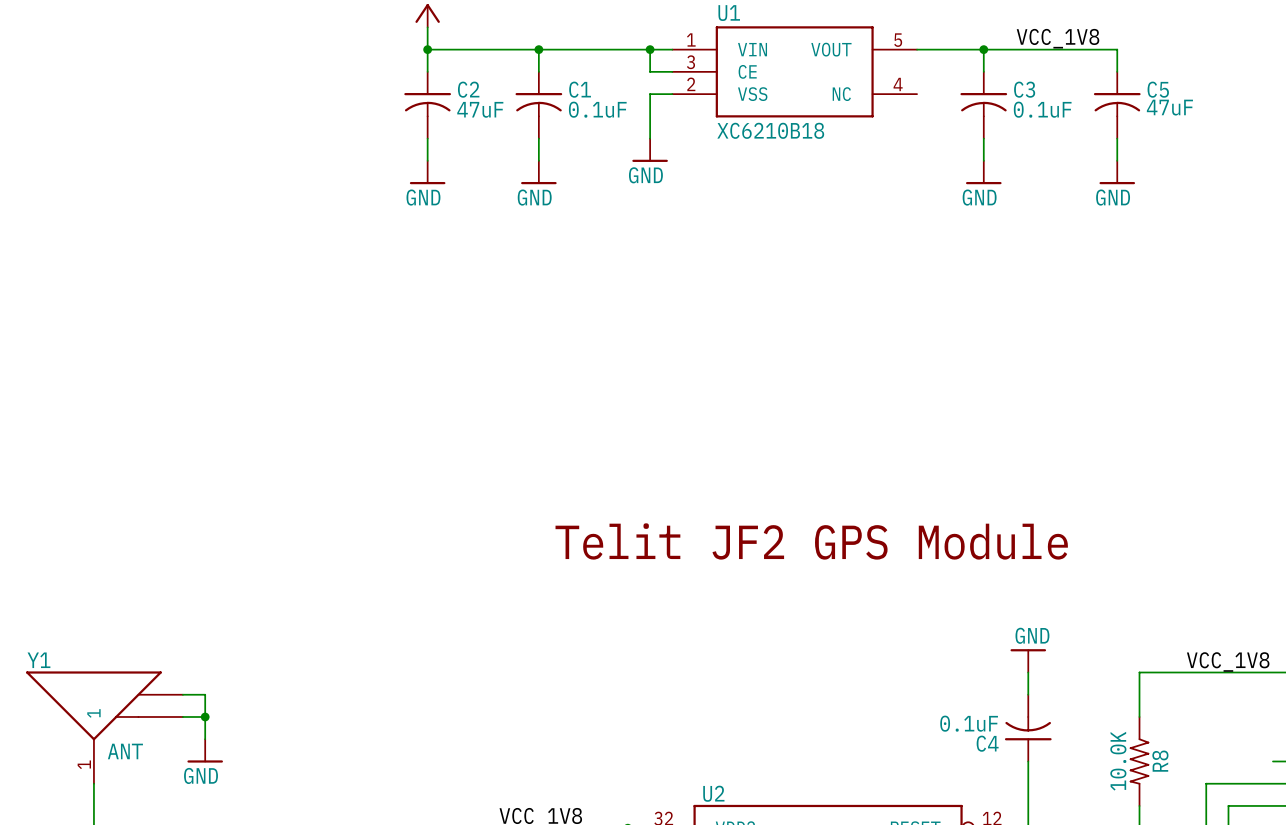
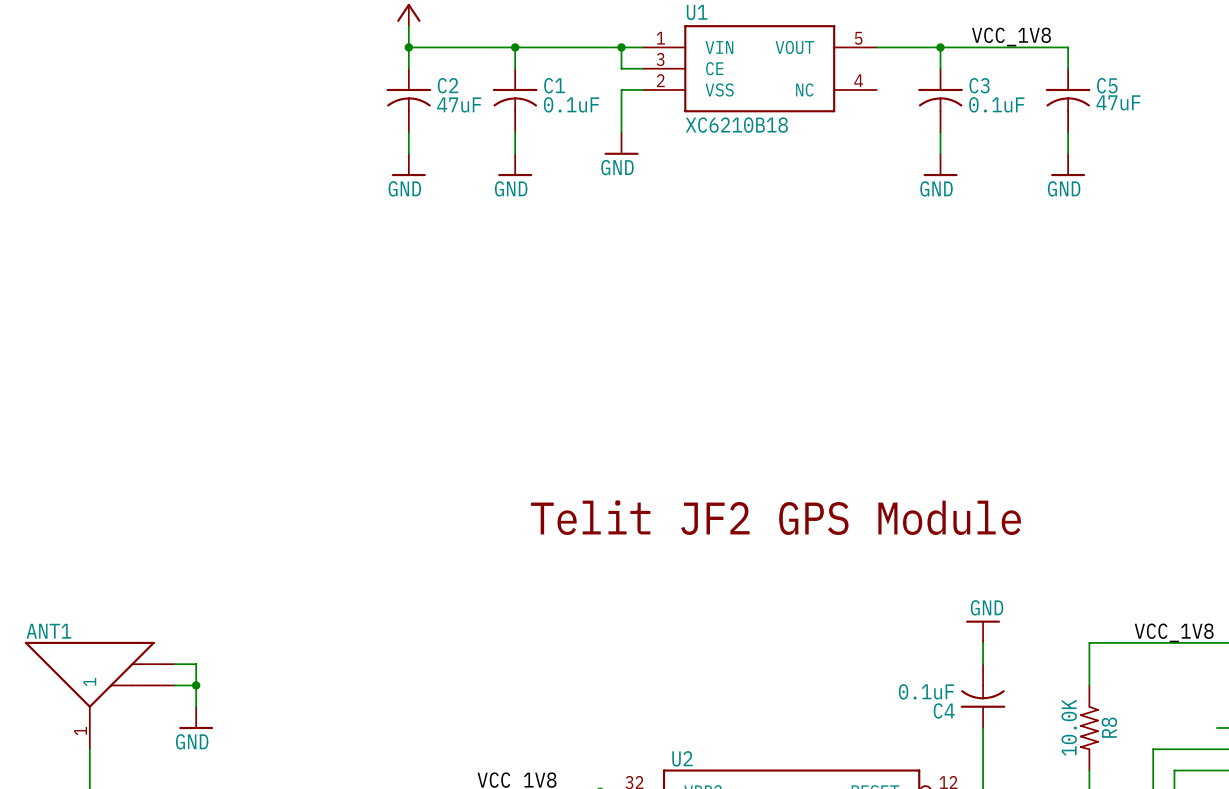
Y1 name: Y1 (38, 660) -> ANT1 (48, 631)
Y1 value: ANT (125, 751) -> none

